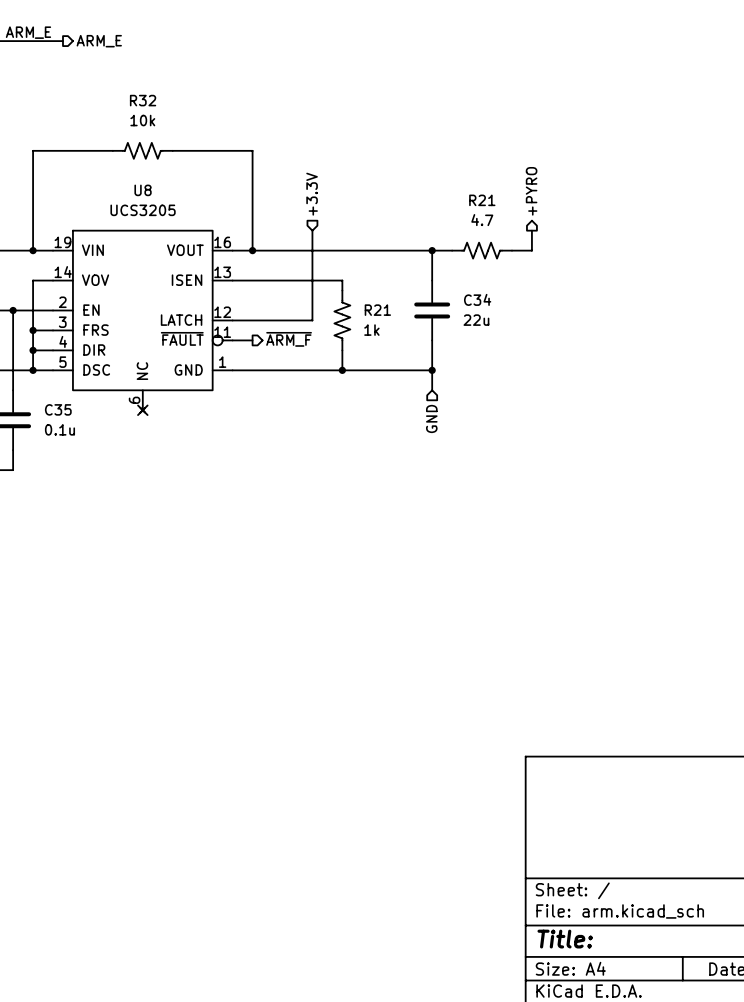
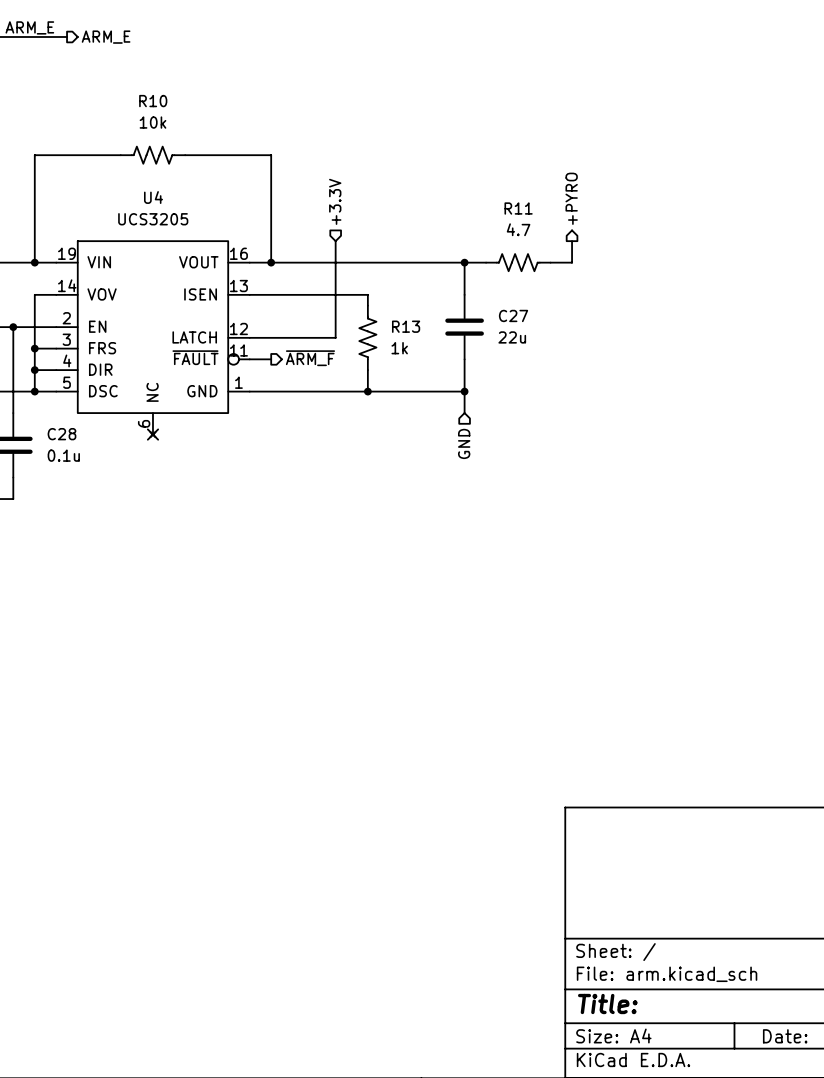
R32 name: R32 (143, 100) -> R10 (153, 101)
U8 name: U8 (143, 190) -> U4 (153, 197)
R21 name: R21 (482, 200) -> R11 (518, 208)
C34 name: C34 (477, 299) -> C27 (513, 315)
R21 name: R21 (377, 310) -> R13 (406, 326)
C35 name: C35 (58, 409) -> C28 (61, 434)

